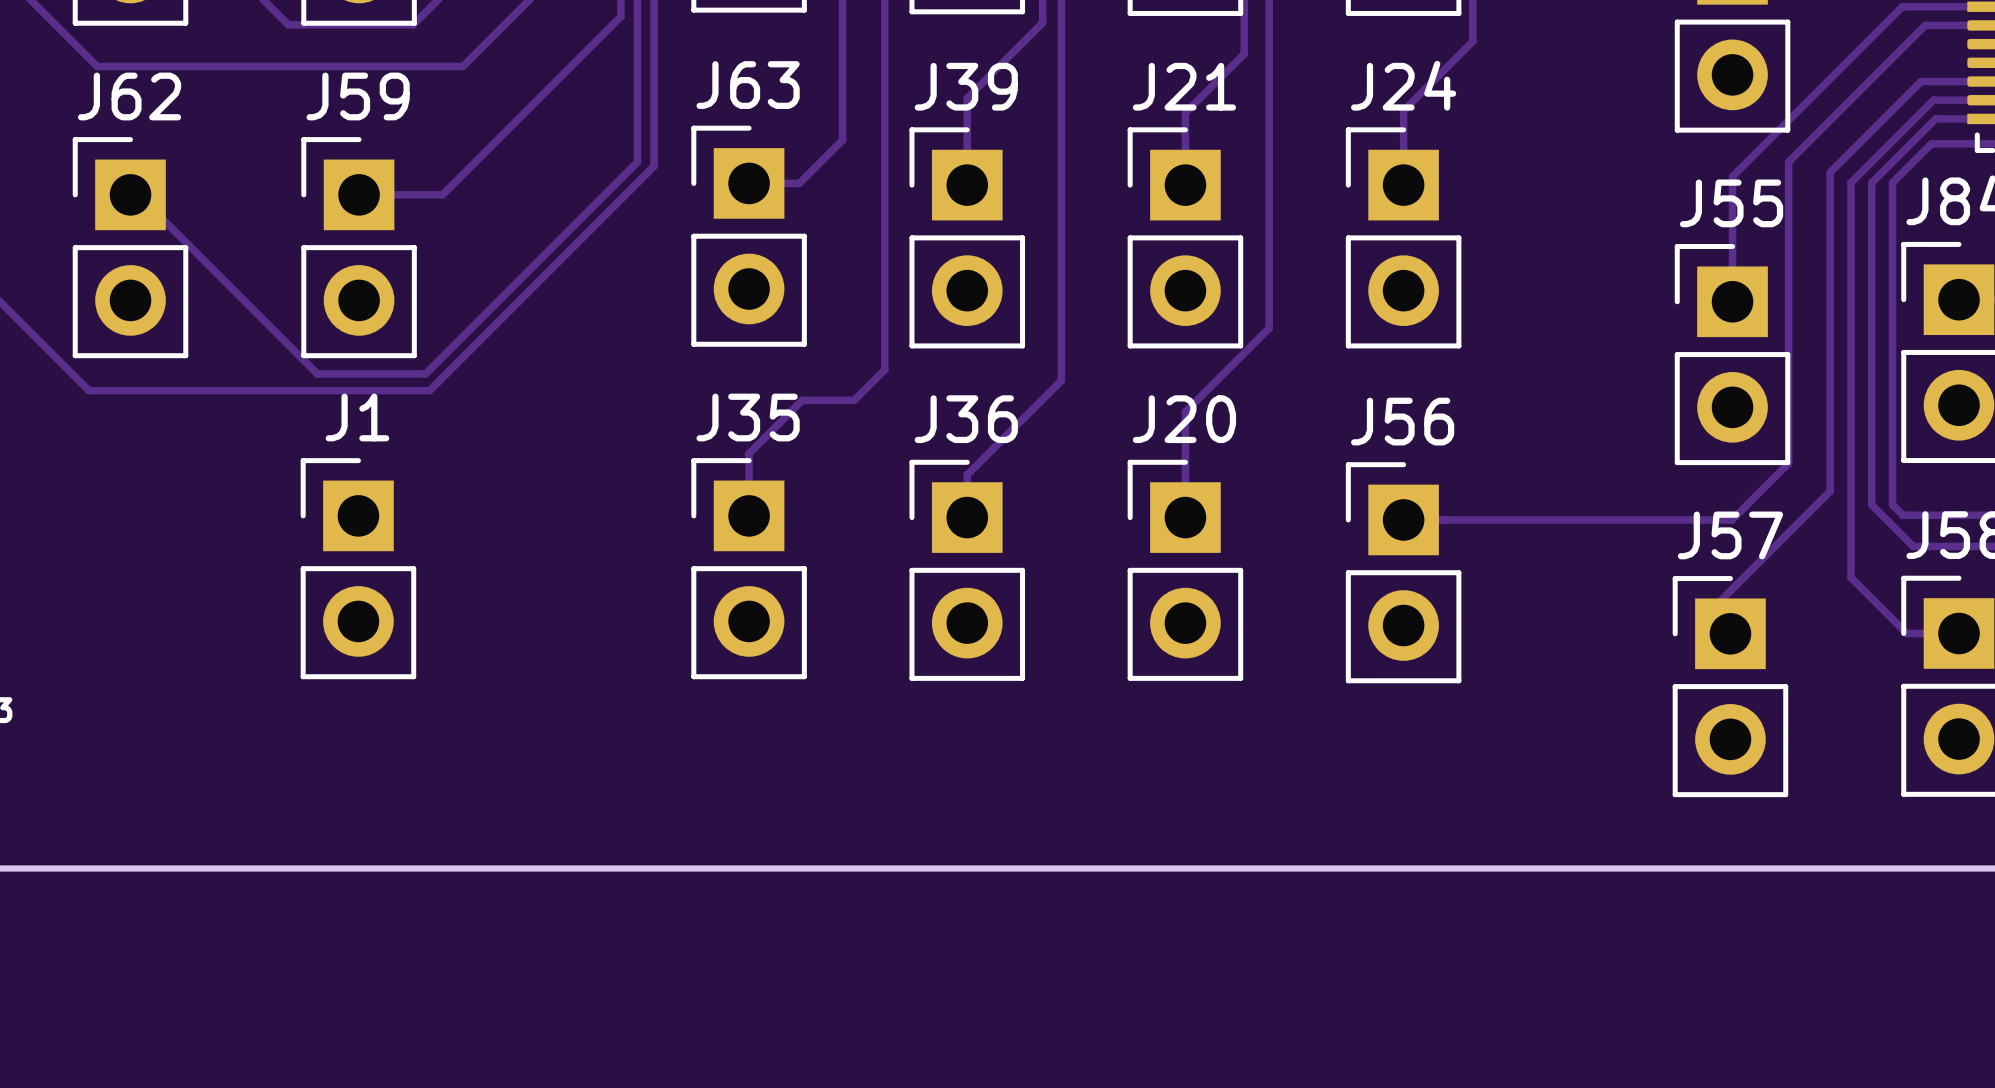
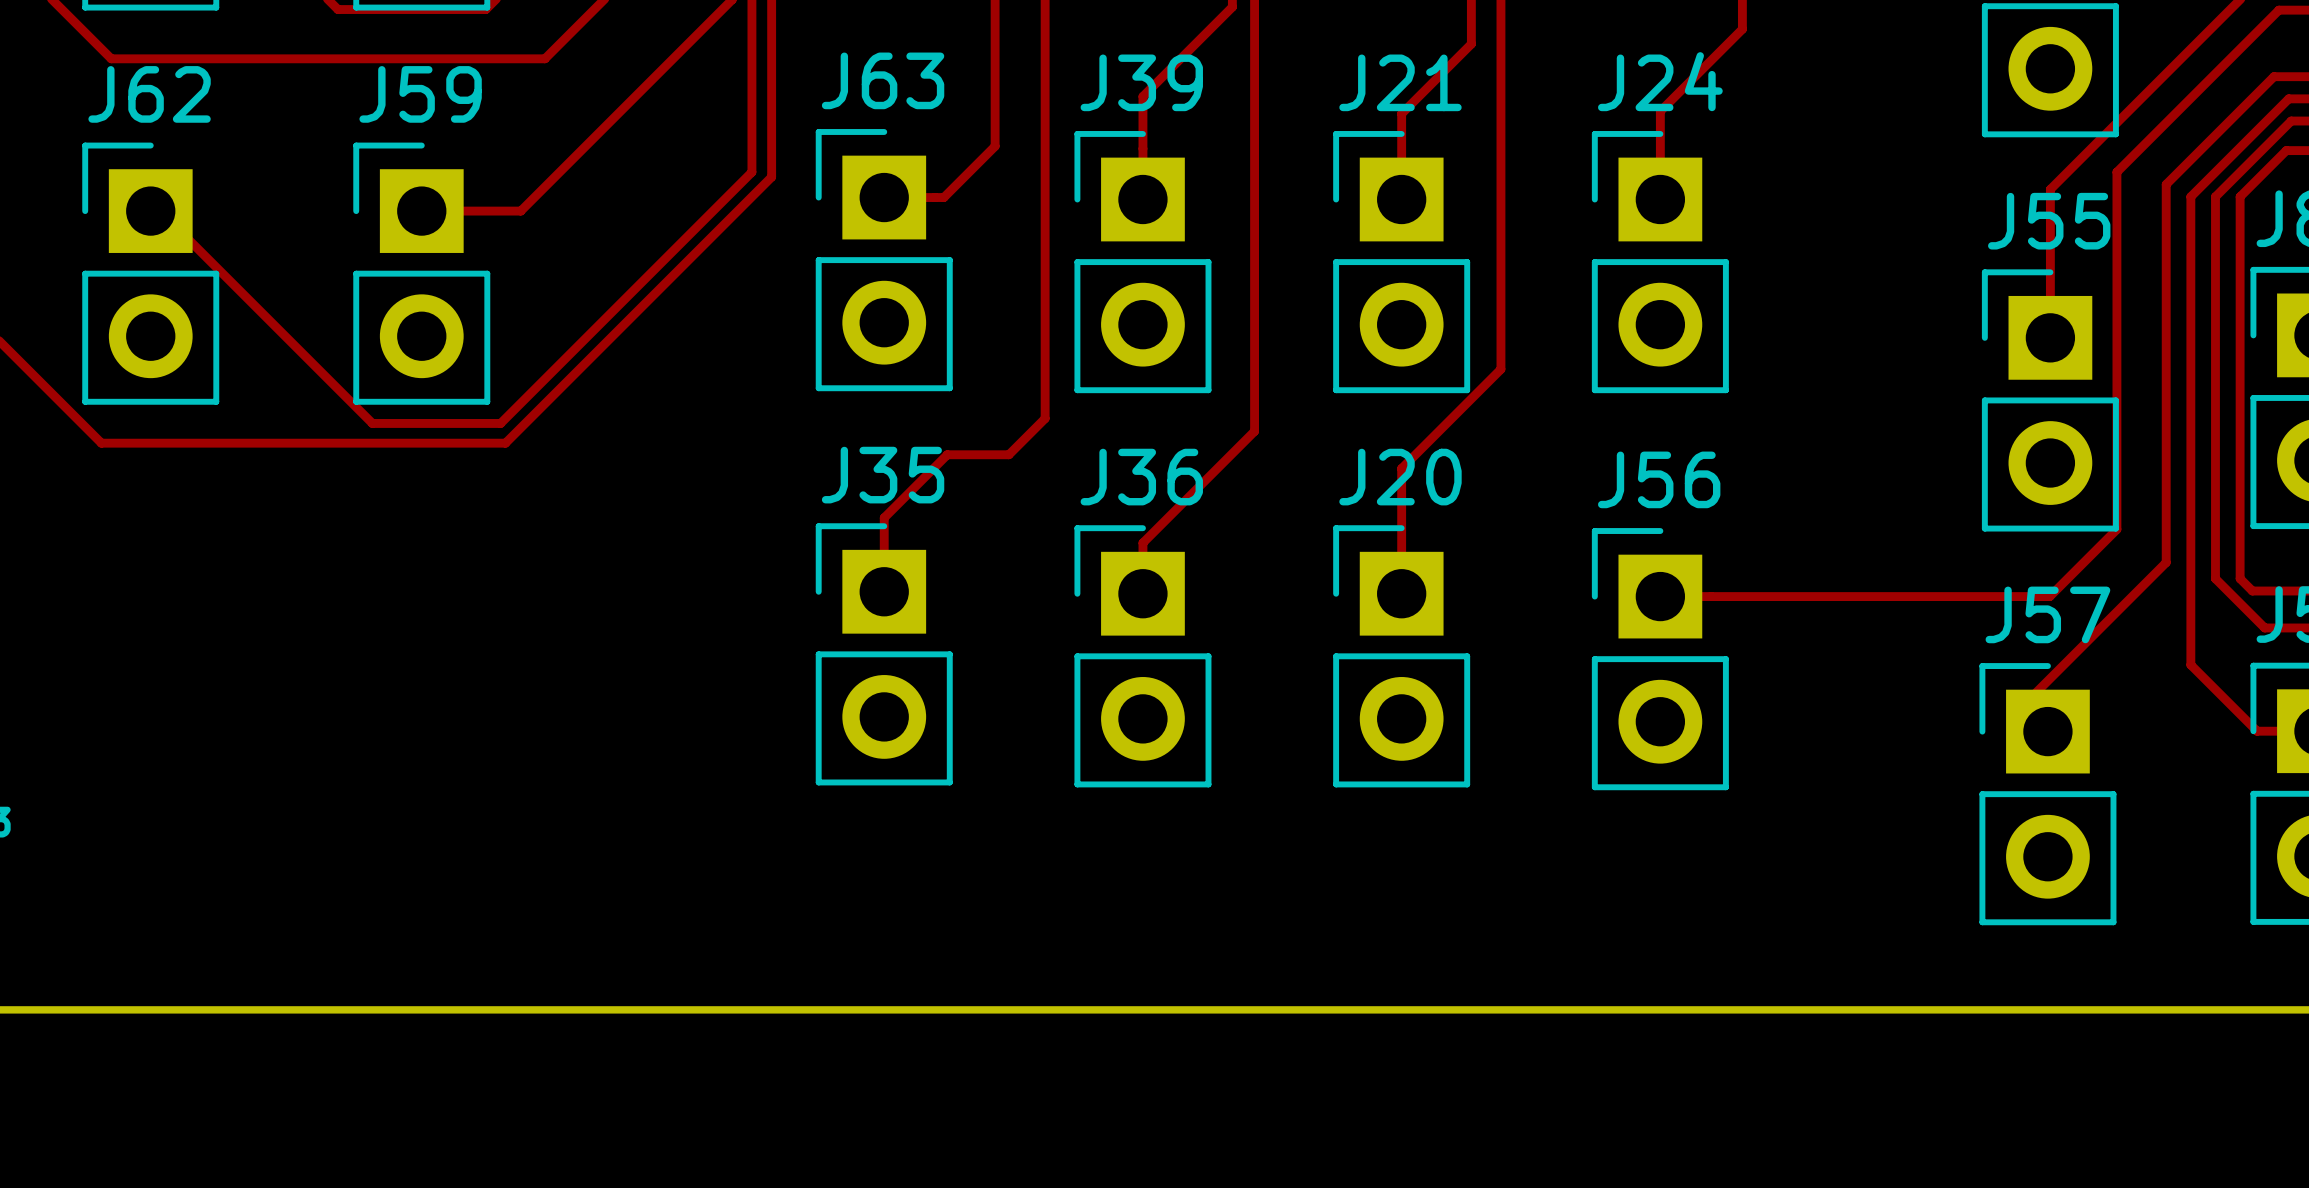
J1: (358, 568) -> none

